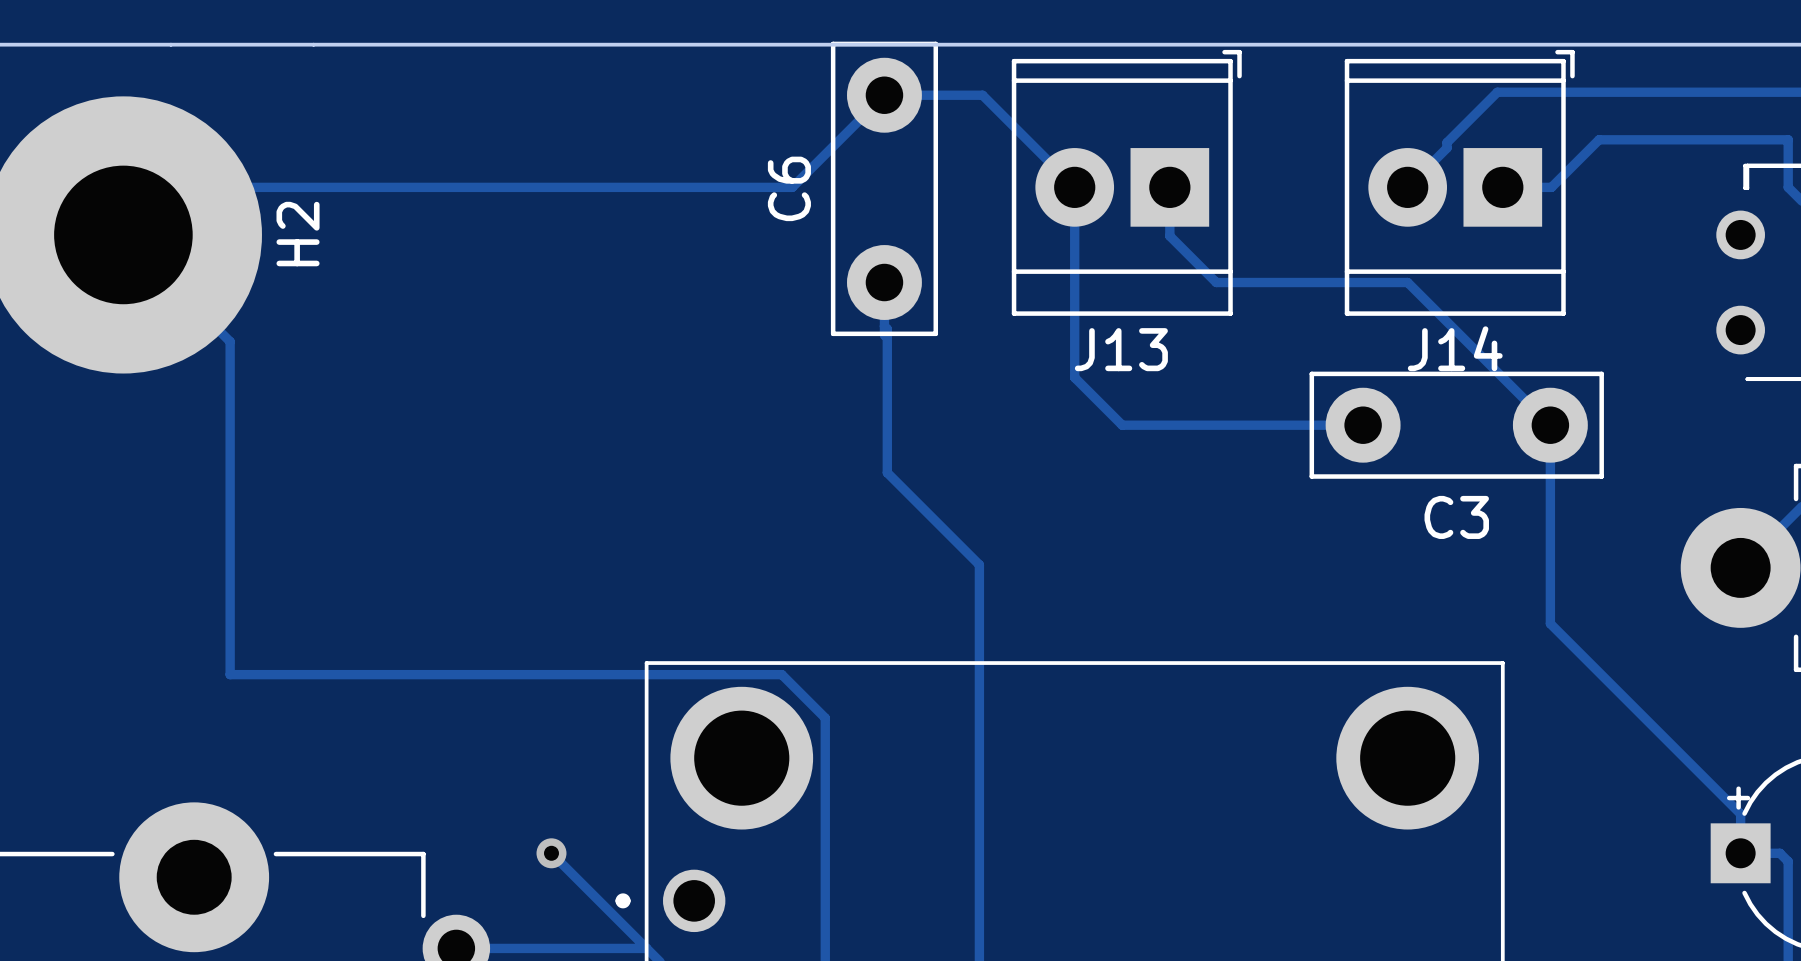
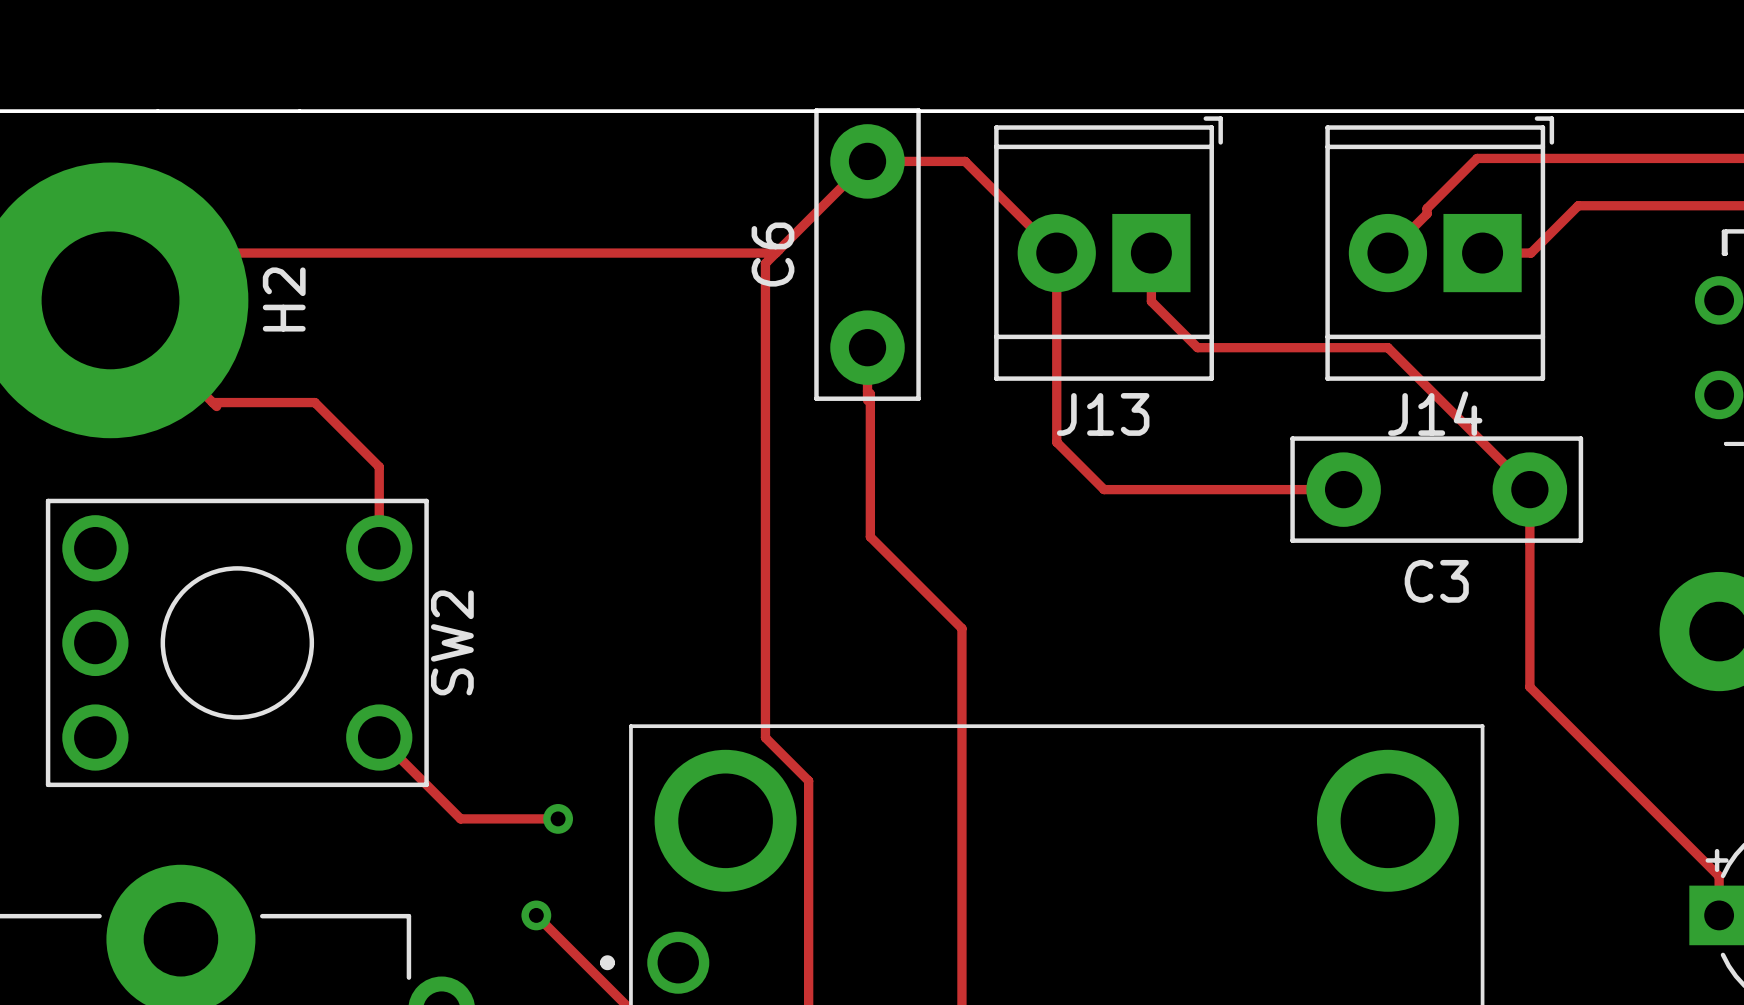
track: none -> (212, 402) (314, 402) (379, 466) (379, 548)
track: (230, 341) (230, 674) (781, 674) -> (775, 253) (765, 263) (765, 737)
SW2: none -> (237, 642)
track: none -> (379, 737) (460, 818) (558, 818)
via: none -> (558, 818)

